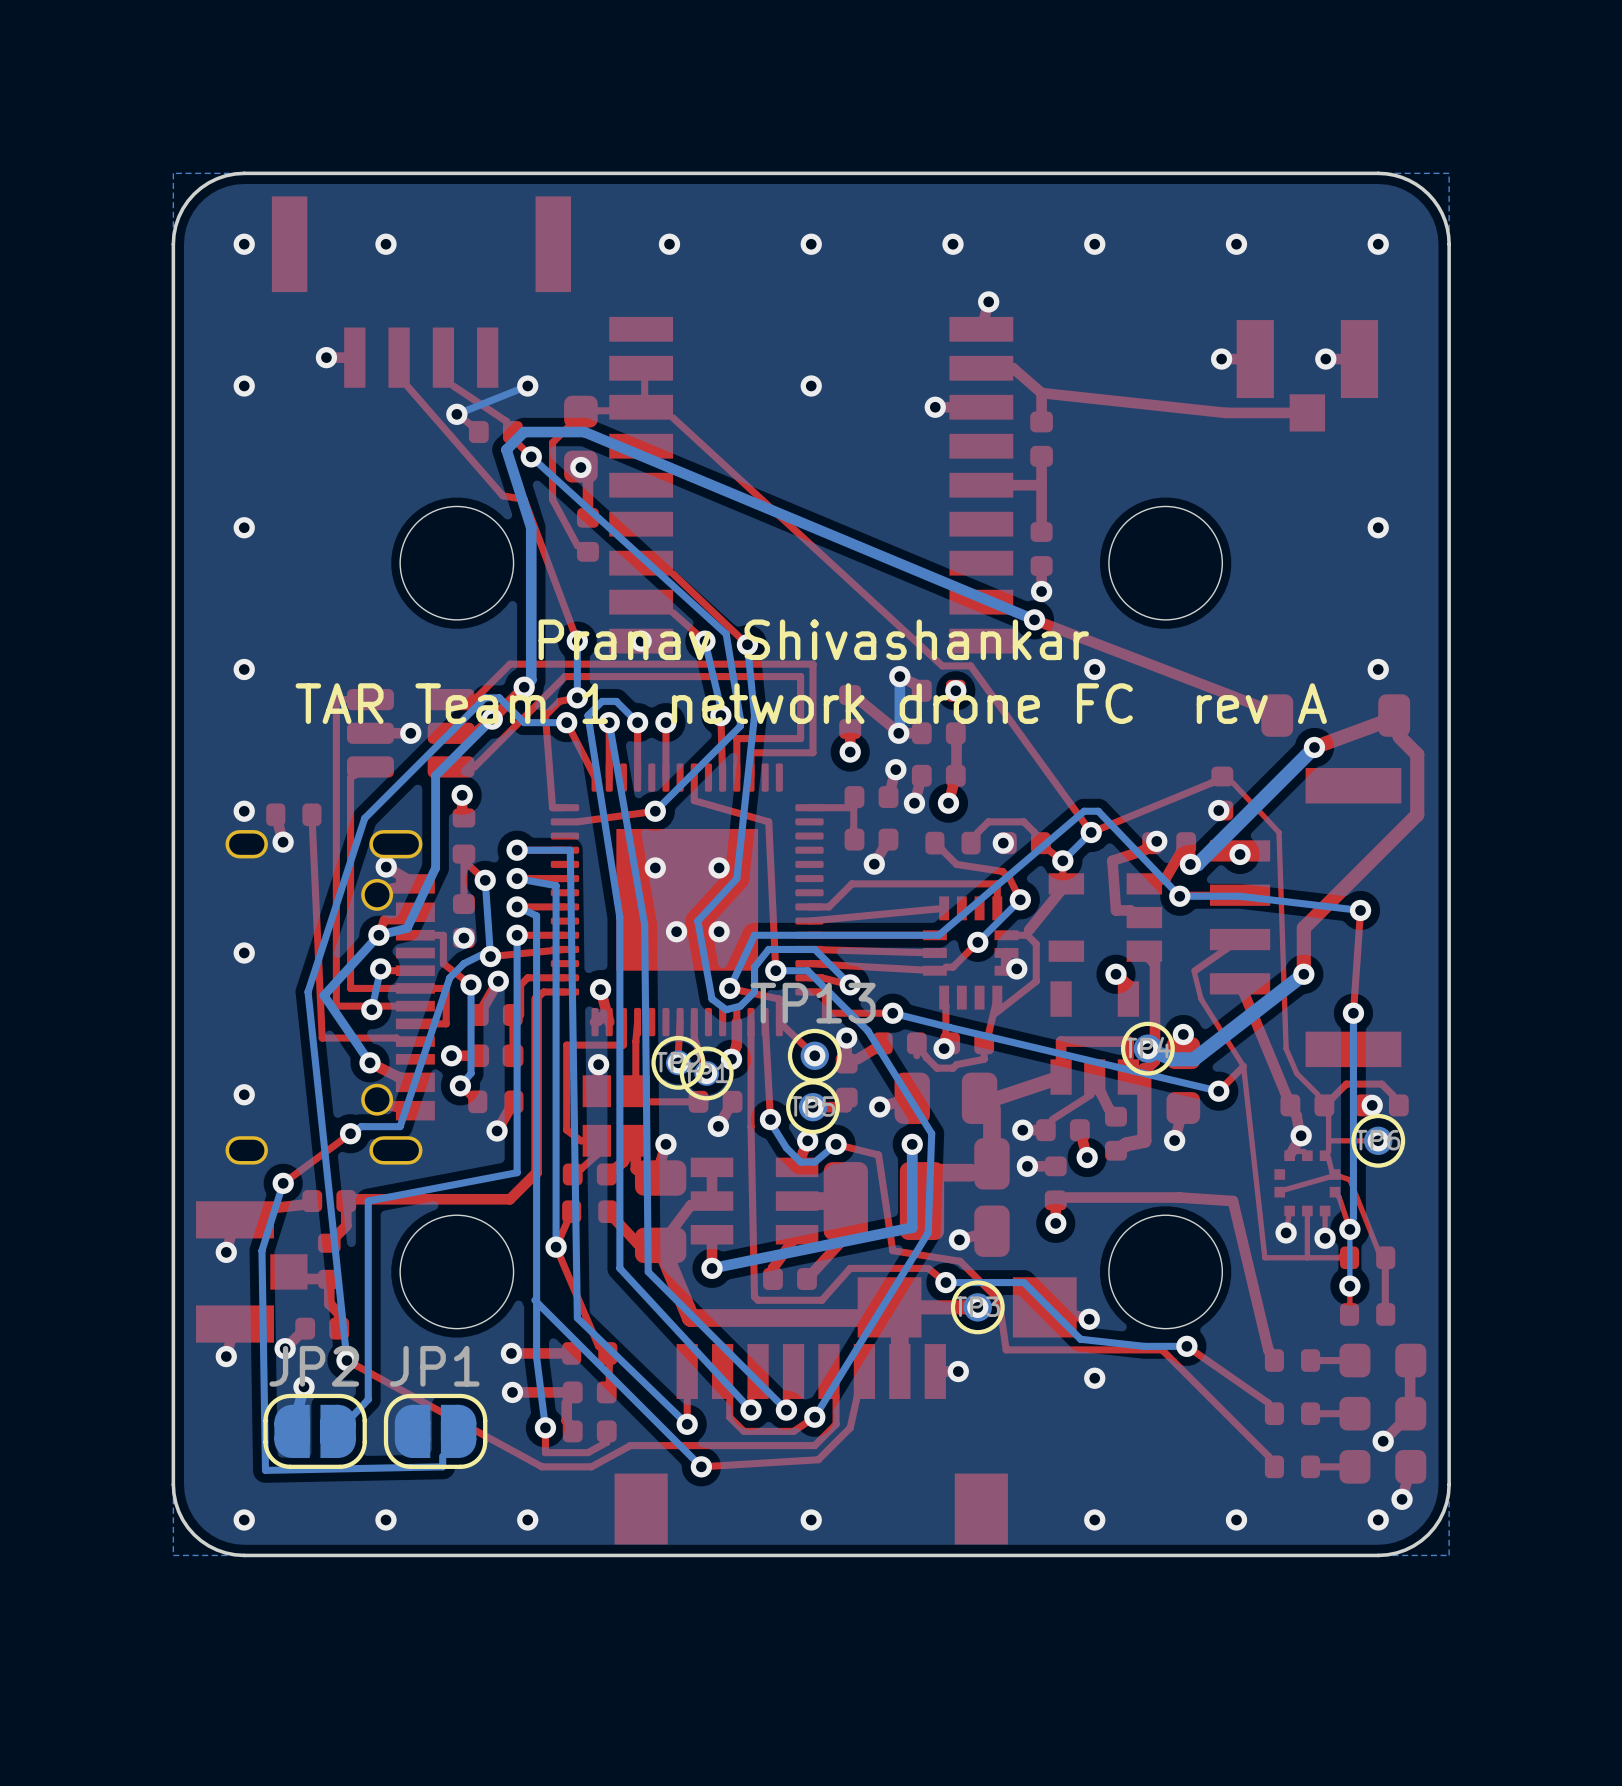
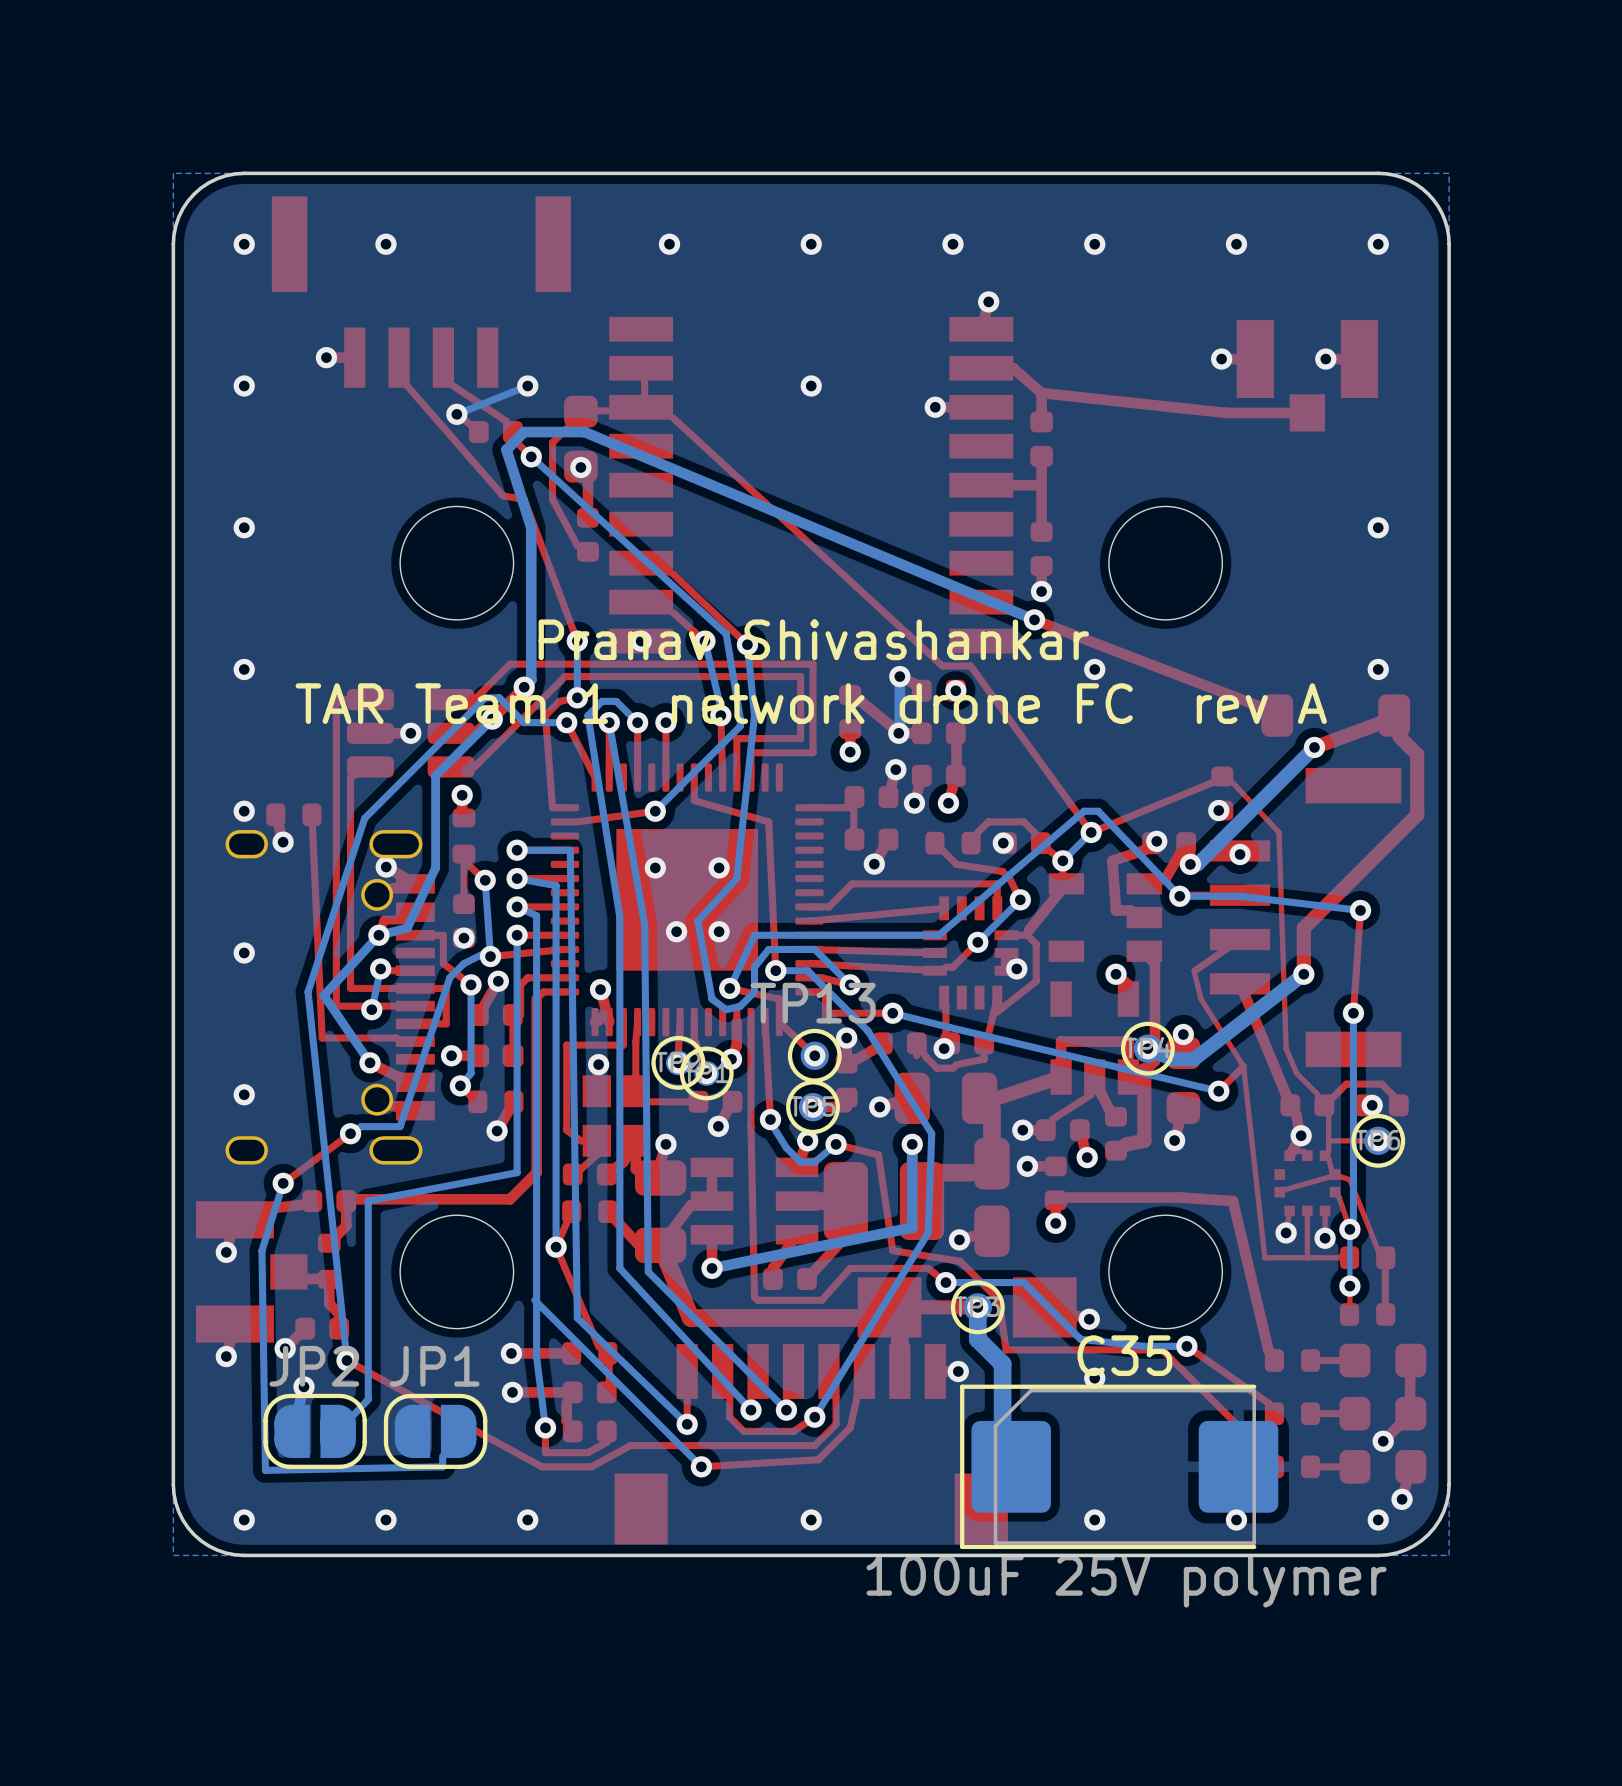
bottom track: none -> (977, 1307) (977, 1339) (1002, 1364) (1002, 1452)
C35: none -> 100uF 25V polymer (1119, 1466)

